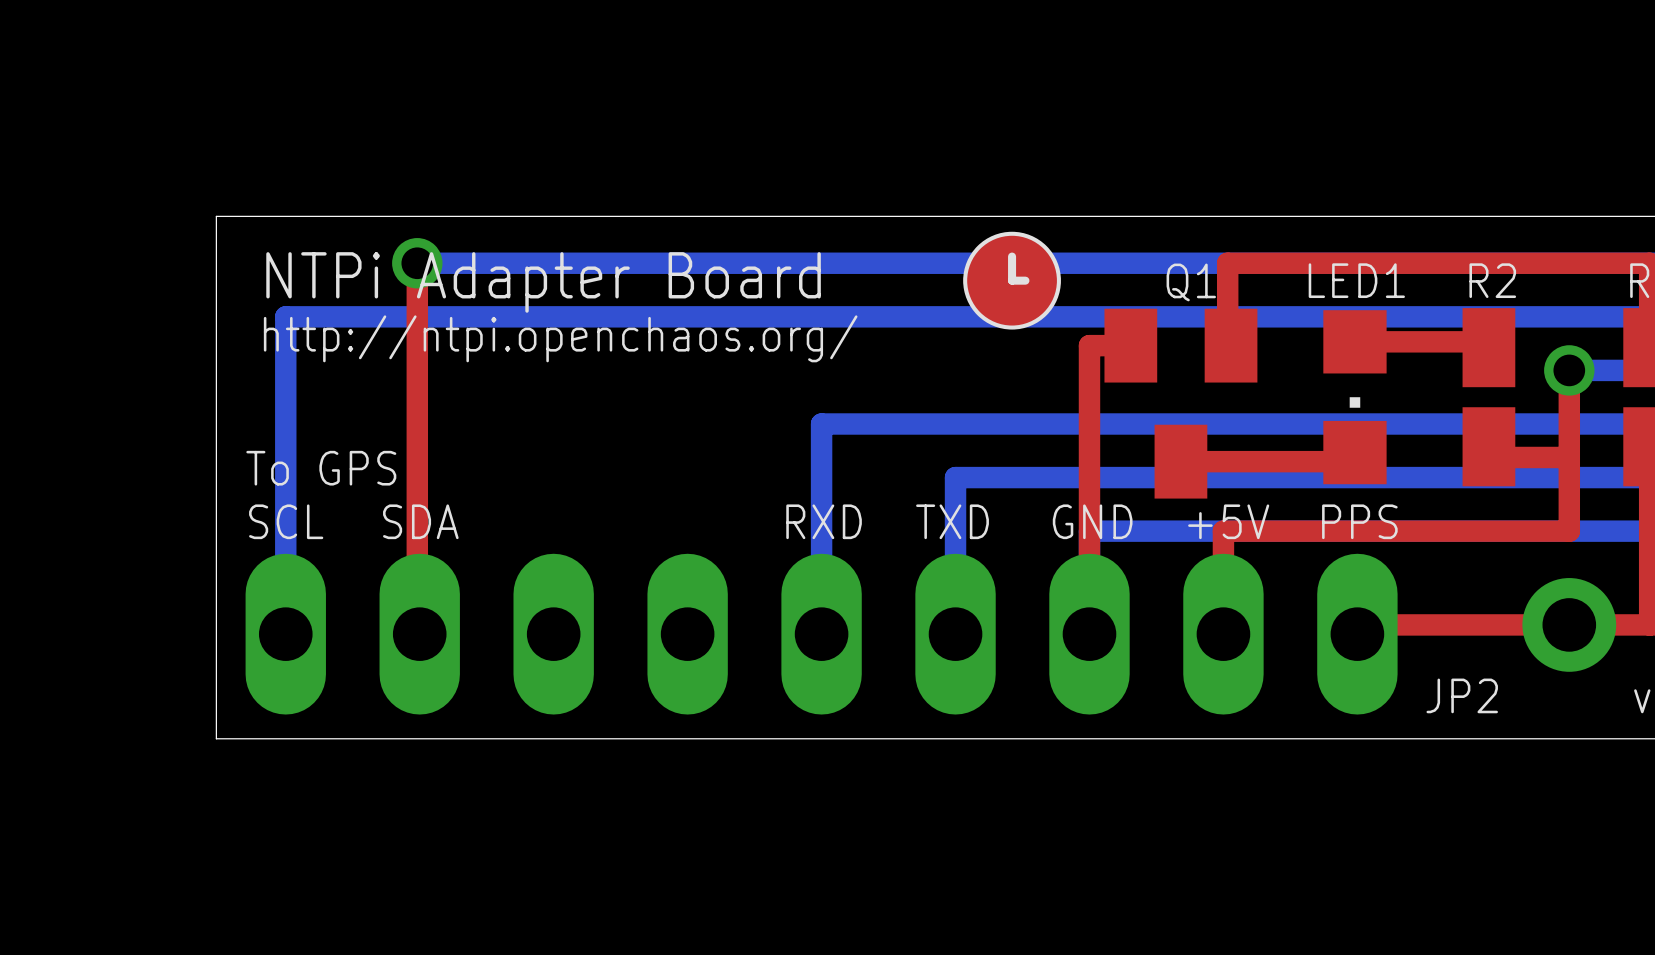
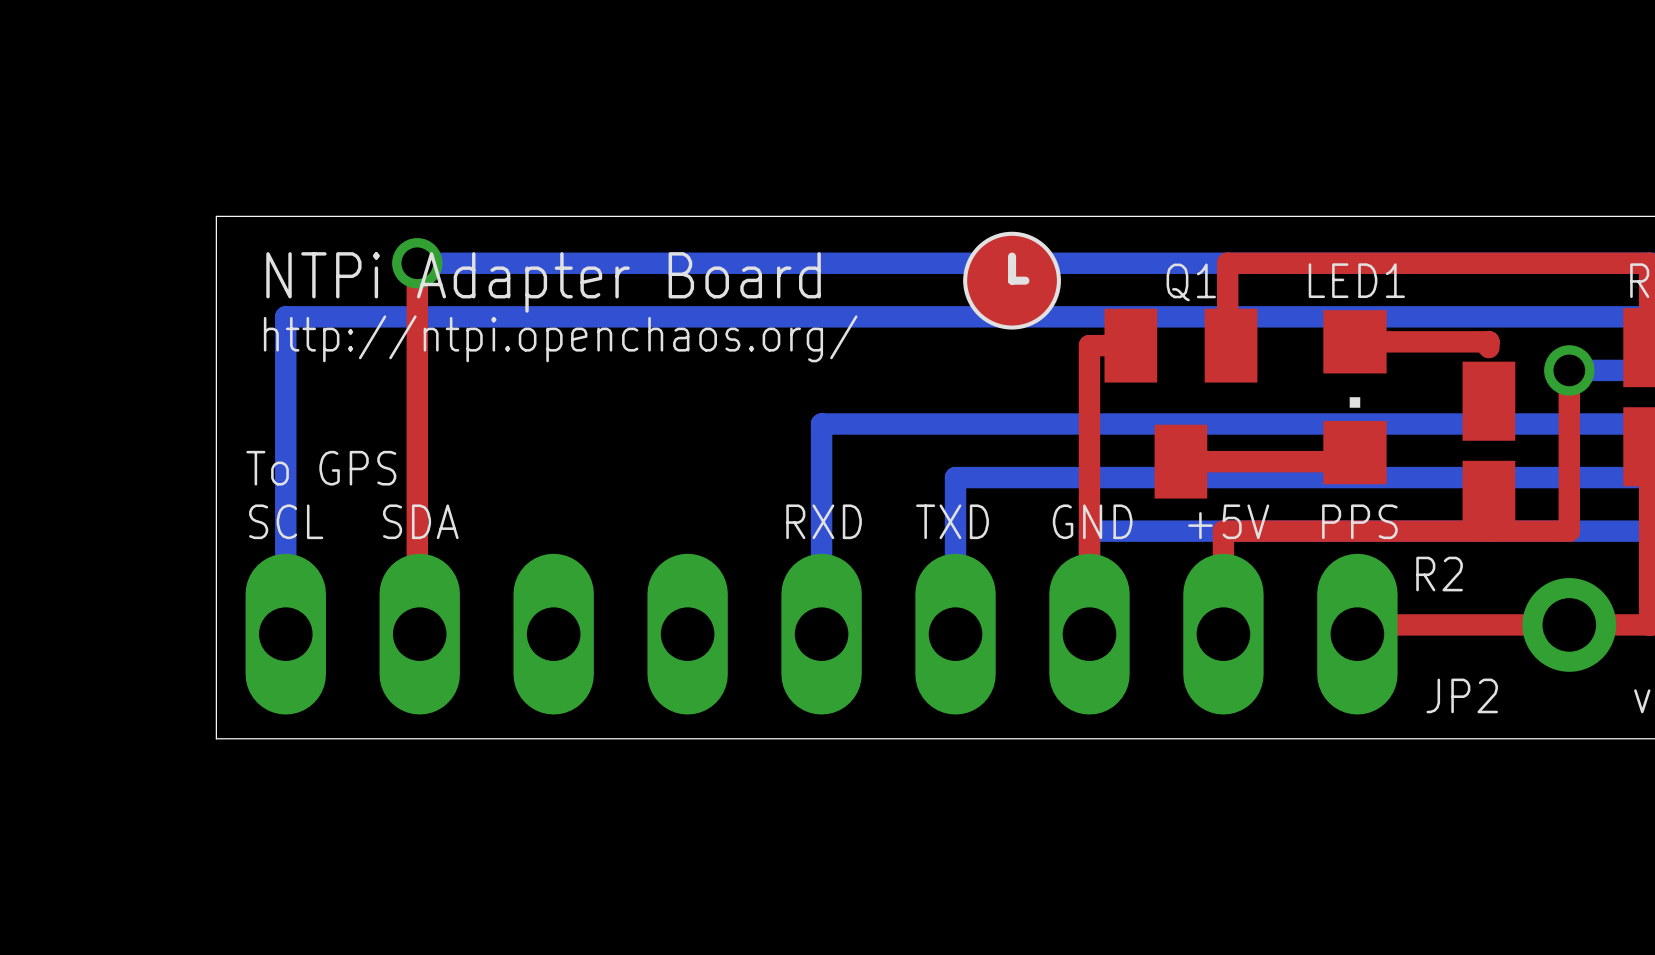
R2 name position: R2 (1492, 280) -> R2 (1439, 574)
R2 position: (1488, 397) -> (1488, 450)
top track: (1488, 446) (1488, 457) (1569, 457) -> none

